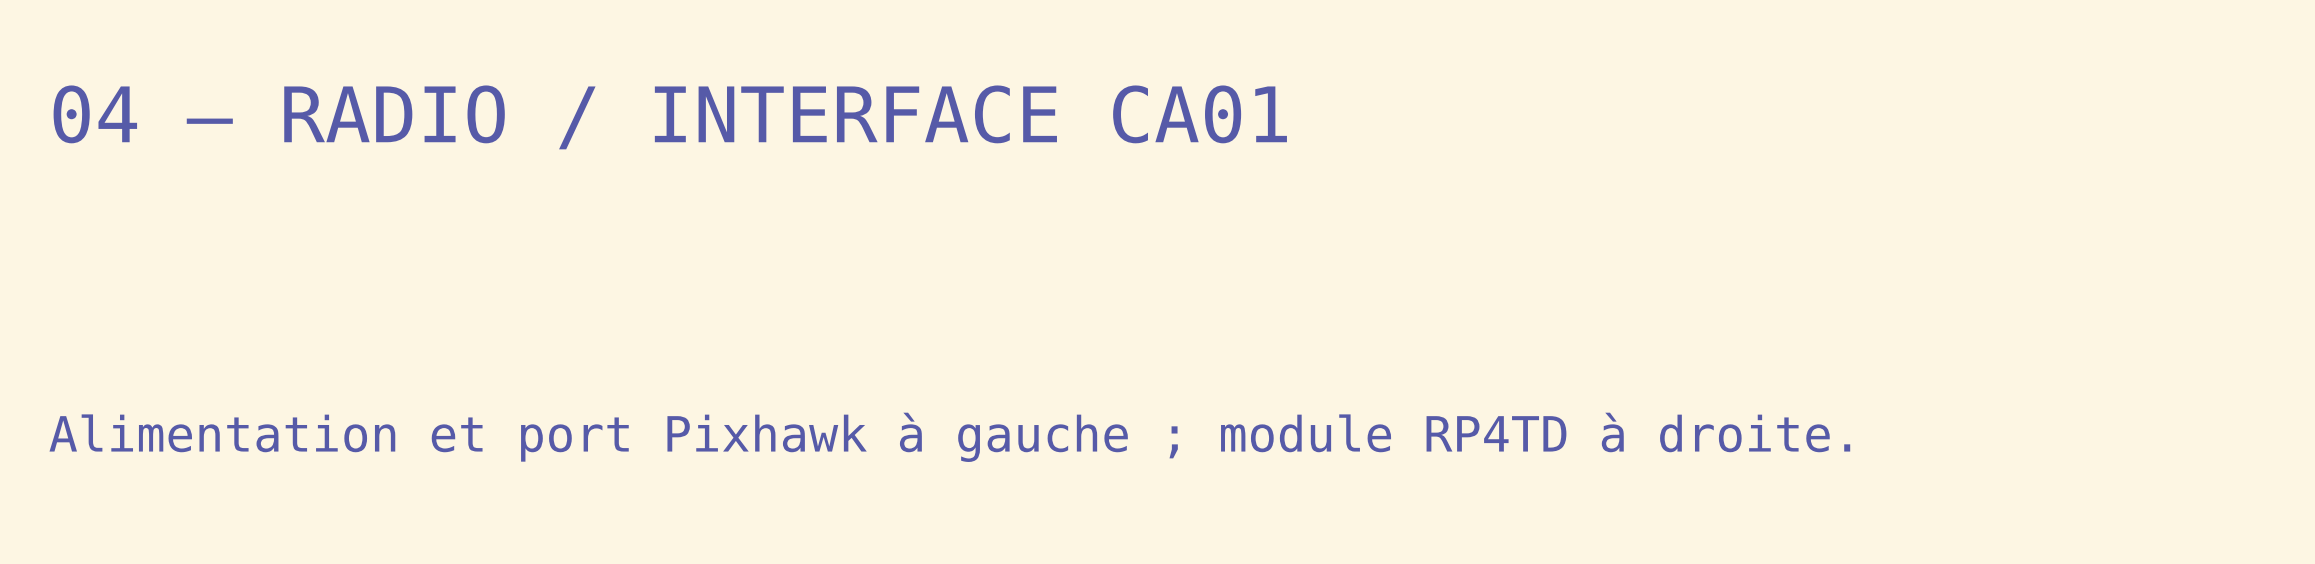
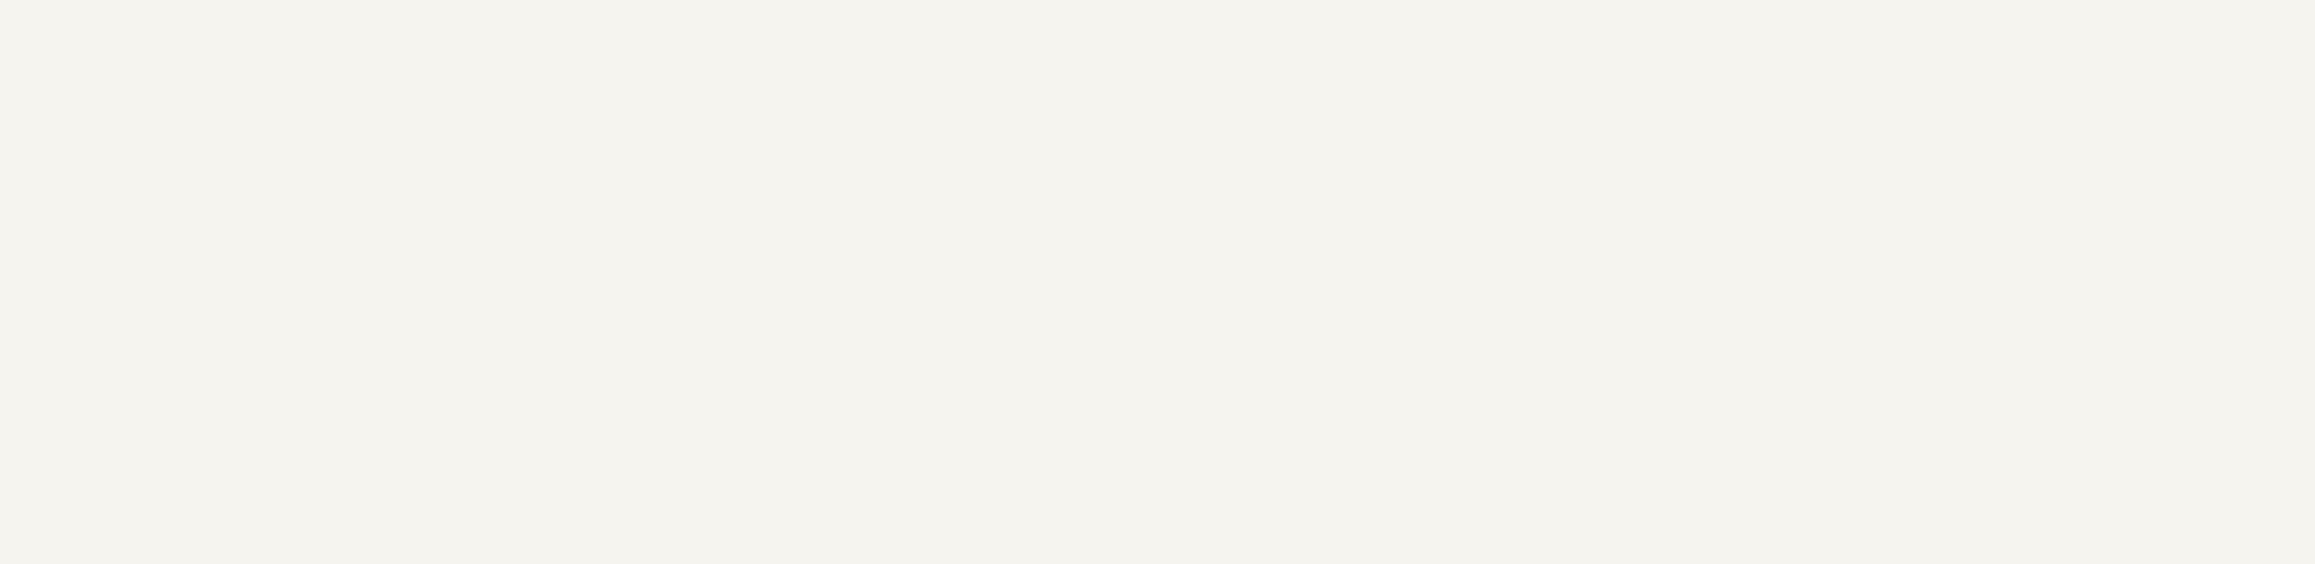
text: 04 — RADIO / INTERFACE CA01 (670, 117) -> none
text: Alimentation et port Pixhawk à gauche ; module RP4TD à droite. (949, 437) -> none

